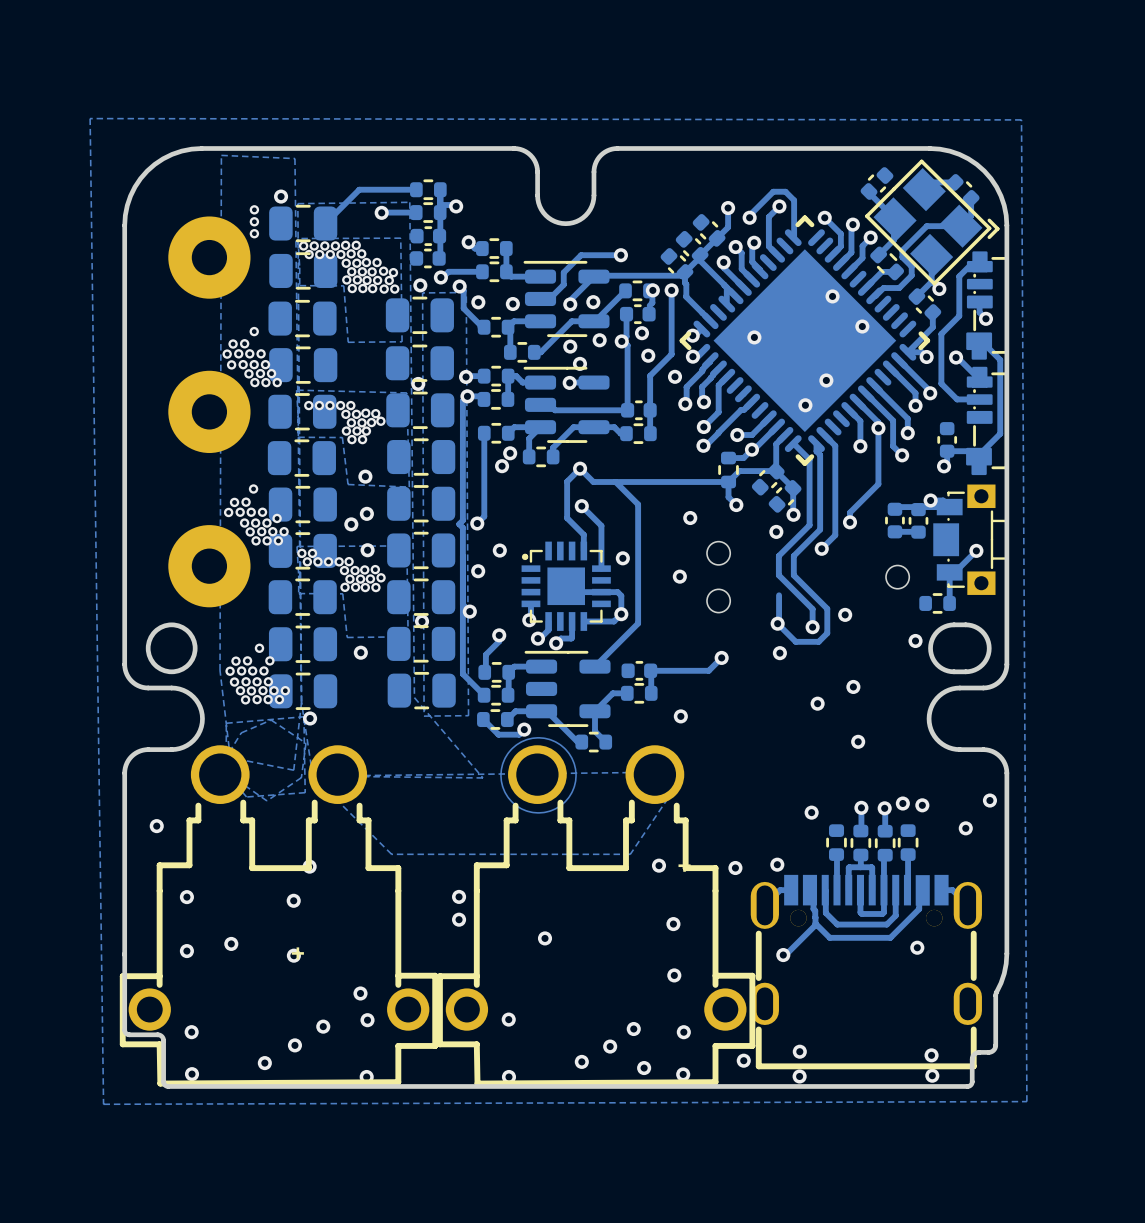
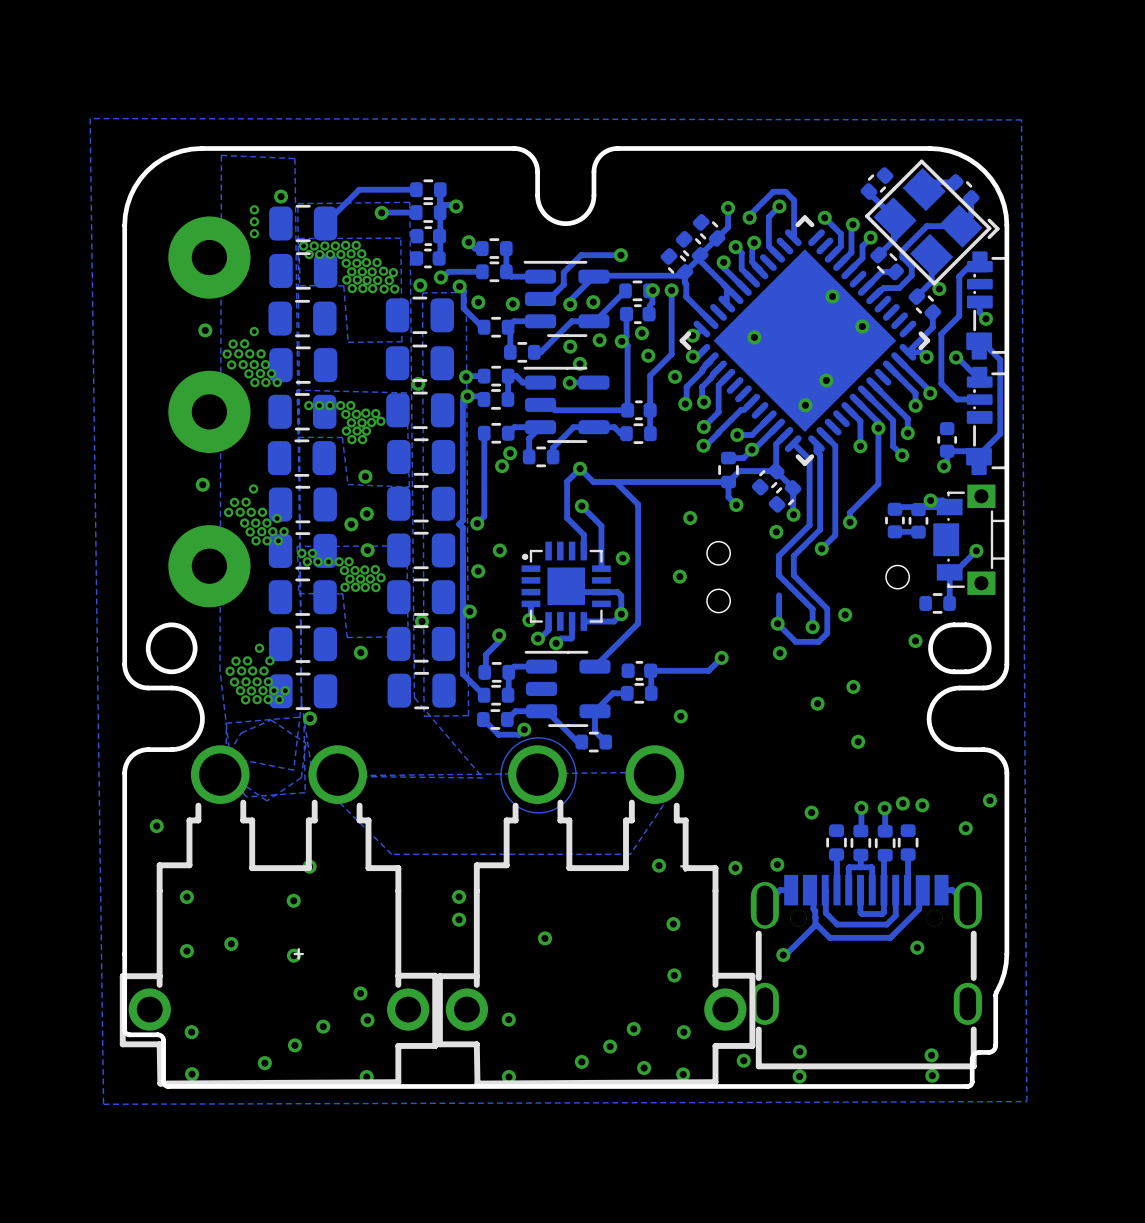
via: none -> (205, 330)
via: none -> (202, 484)

